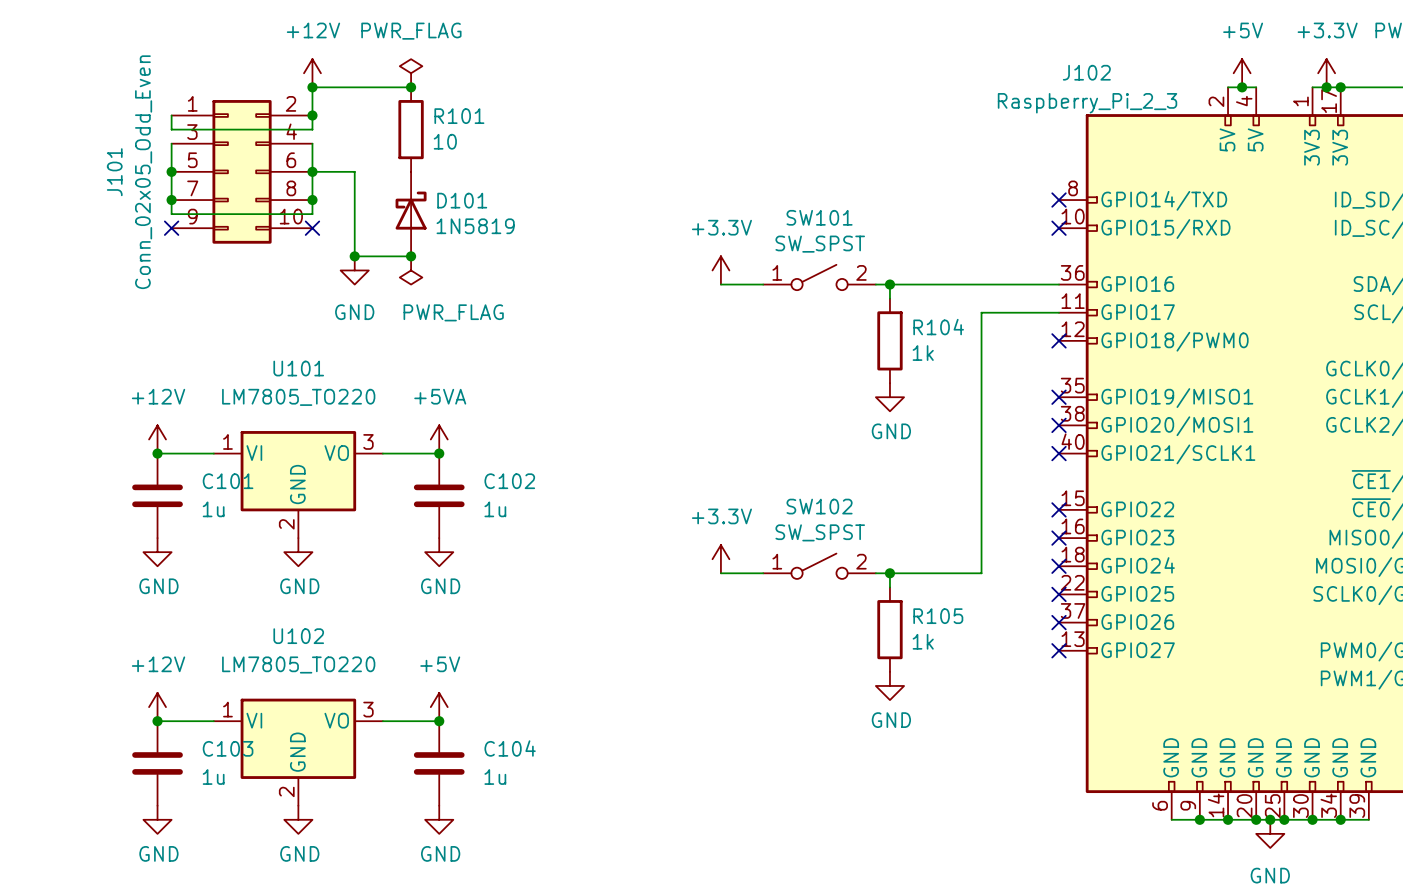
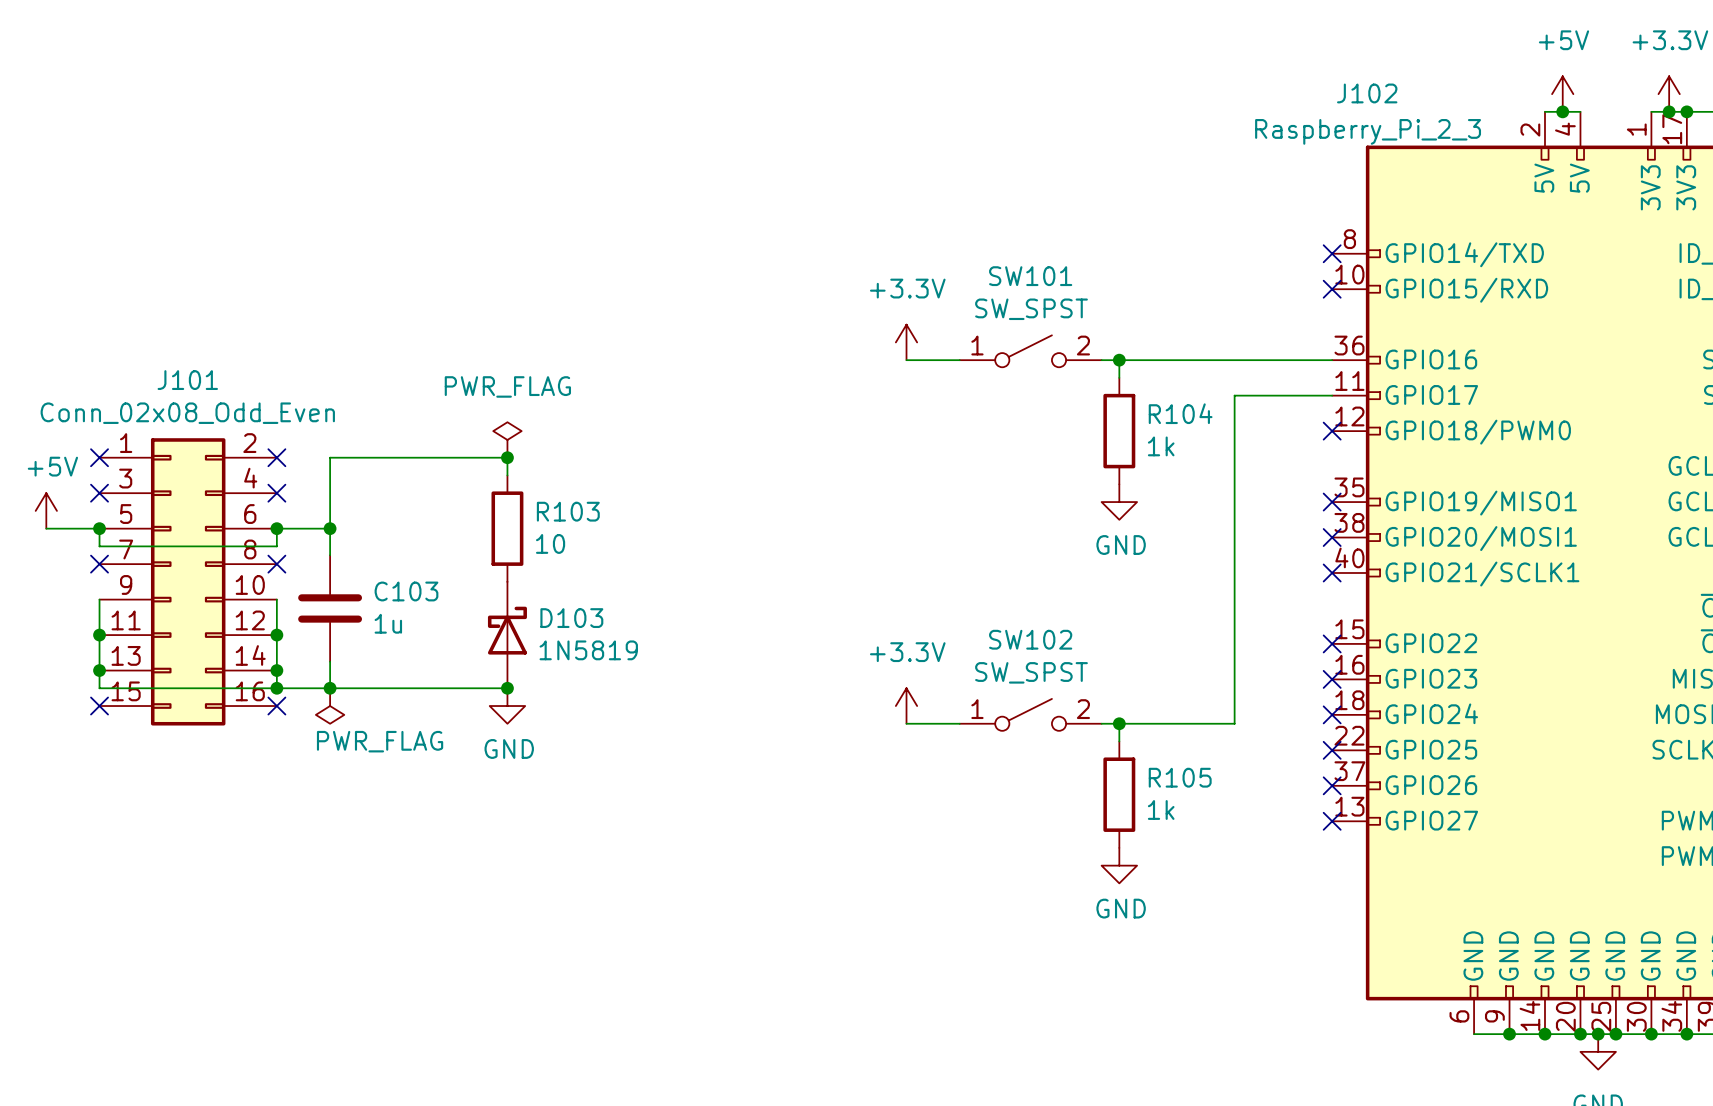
power symbol: +12V (312, 73) -> none
power symbol: PWR_FLAG (411, 73) -> none
junction: (312, 87) -> none
wire: (411, 87) (312, 87) (312, 129) (171, 129) (171, 115) -> none
junction: (411, 87) -> none
J101 symbol: [171, 100, 313, 244] -> [99, 438, 277, 726]
junction: (312, 115) -> none
R101: 10 (411, 129) -> none
wire: (171, 143) (171, 214) (312, 214) (312, 143) -> none
junction: (171, 171) -> none
wire: (312, 171) (354, 171) (354, 256) (411, 256) -> none
junction: (312, 171) -> none
J101 name position: J101 (114, 172) -> J101 (187, 380)
J101 value: Conn_02x05_Odd_Even (143, 172) -> Conn_02x08_Odd_Even (187, 413)
junction: (171, 200) -> none
junction: (312, 200) -> none
D101: 1N5819 (411, 214) -> none
no-connect mark: (171, 228) -> none
no-connect mark: (312, 228) -> none
junction: (354, 256) -> none
junction: (411, 256) -> none
power symbol: GND (354, 270) -> none
power symbol rotation: 0° (411, 270) -> 180° (507, 439)
power symbol position: PWR_FLAG (411, 270) -> PWR_FLAG (507, 439)
power symbol text position: PWR_FLAG (453, 312) -> PWR_FLAG (507, 386)
no-connect mark: none -> (99, 457)
no-connect mark: none -> (276, 457)
junction: none -> (507, 457)
wire: none -> (507, 475) (507, 457) (330, 457) (330, 555)
no-connect mark: none -> (99, 493)
no-connect mark: none -> (276, 493)
power symbol: none -> +5V (46, 510)
wire: none -> (46, 528) (99, 528) (99, 546) (276, 546) (276, 528) (330, 528)
junction: none -> (99, 528)
junction: none -> (276, 528)
junction: none -> (330, 528)
R103: none -> 10 (507, 528)
power symbol: +12V (157, 439) -> none
power symbol: +5VA (439, 439) -> none
no-connect mark: none -> (99, 564)
no-connect mark: none -> (276, 564)
wire: (157, 453) (213, 453) -> none
junction: (157, 453) -> none
wire: (382, 453) (439, 453) -> none
junction: (439, 453) -> none
wire: none -> (99, 599) (99, 688) (507, 688)
wire: none -> (276, 599) (276, 688)
U101: LM7805_TO220 (298, 484) -> none
C101: 1u (157, 495) -> none
C102: 1u (439, 495) -> none
junction: none -> (99, 635)
junction: none -> (276, 635)
D103: none -> 1N5819 (507, 635)
wire: none -> (330, 661) (330, 688)
junction: none -> (99, 670)
junction: none -> (276, 670)
junction: none -> (276, 688)
junction: none -> (330, 688)
junction: none -> (507, 688)
power symbol: GND (157, 552) -> none
power symbol: GND (298, 552) -> none
power symbol position: GND (439, 552) -> GND (507, 706)
no-connect mark: none -> (99, 706)
no-connect mark: none -> (276, 706)
power symbol: none -> PWR_FLAG (330, 706)
power symbol: +12V (157, 707) -> none
power symbol: +5V (439, 707) -> none
wire: (157, 721) (213, 721) -> none
junction: (157, 721) -> none
wire: (382, 721) (439, 721) -> none
junction: (439, 721) -> none
C103 name position: C103 (228, 748) -> C103 (406, 591)
U102: LM7805_TO220 (298, 752) -> none
C103 position: (157, 763) -> (330, 608)
C104: 1u (439, 763) -> none
C103 value position: 1u (213, 777) -> 1u (388, 623)
power symbol: GND (157, 819) -> none
power symbol: GND (298, 819) -> none
power symbol: GND (439, 819) -> none

